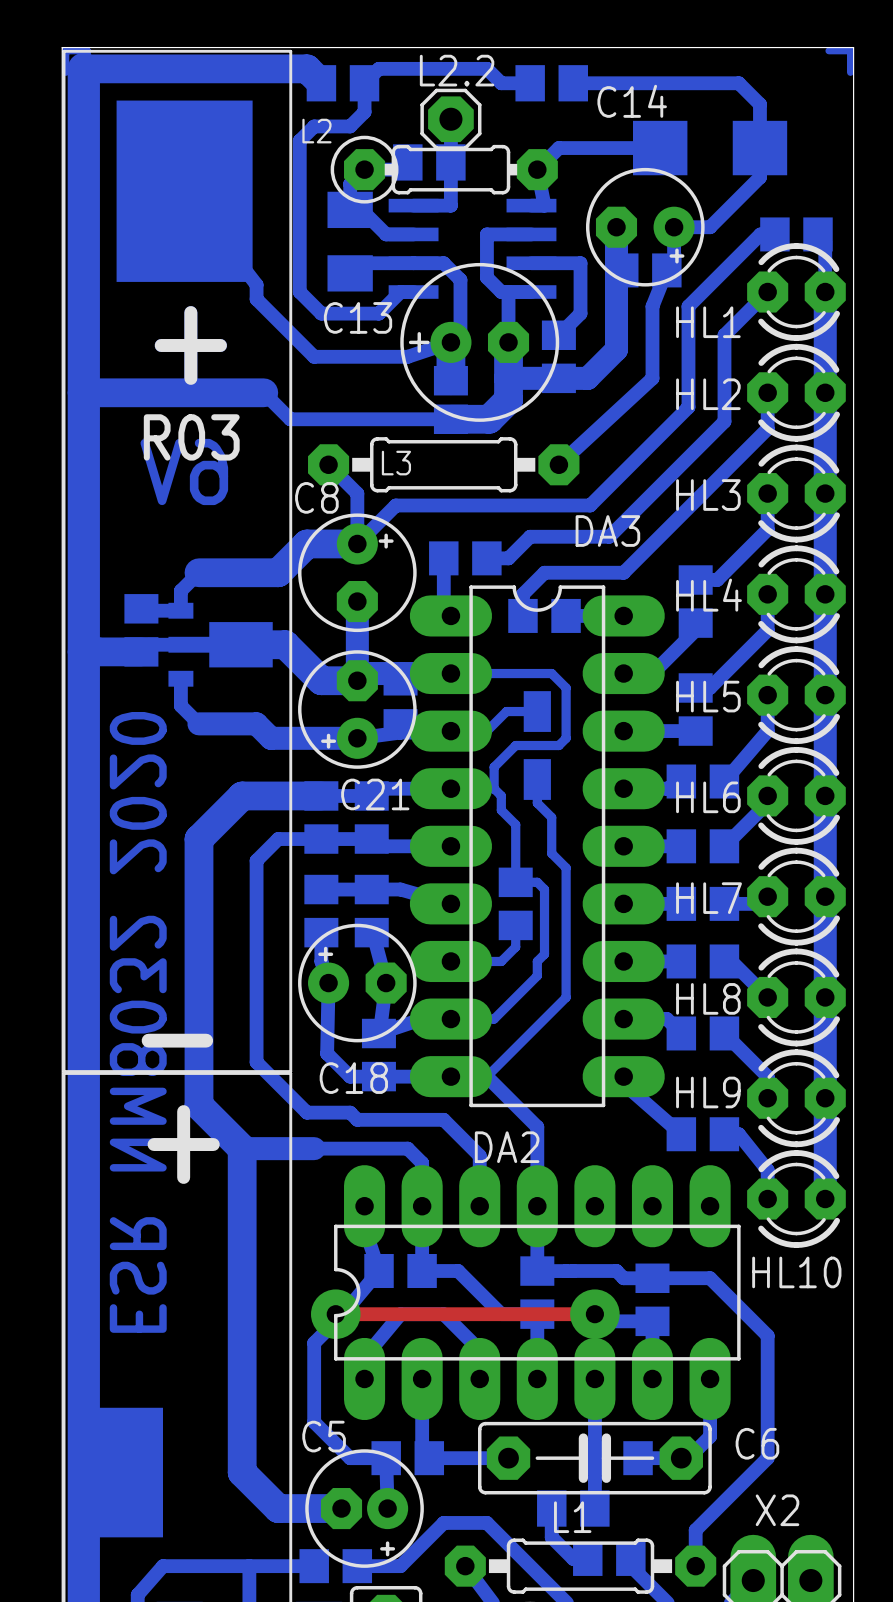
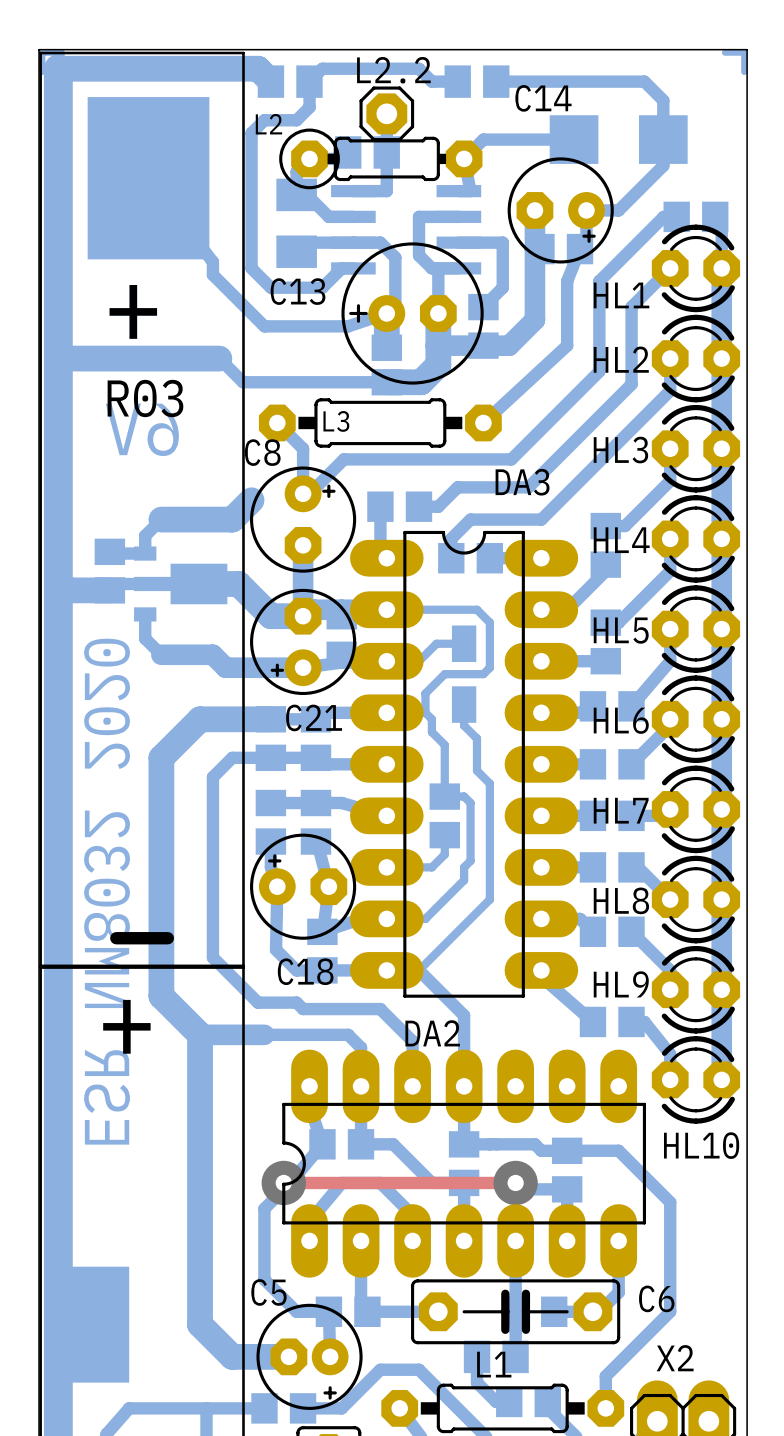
bottom track: (403, 505) (395, 505) (357, 543) (306, 543) (299, 551) -> (343, 459) (303, 500) (303, 493)

